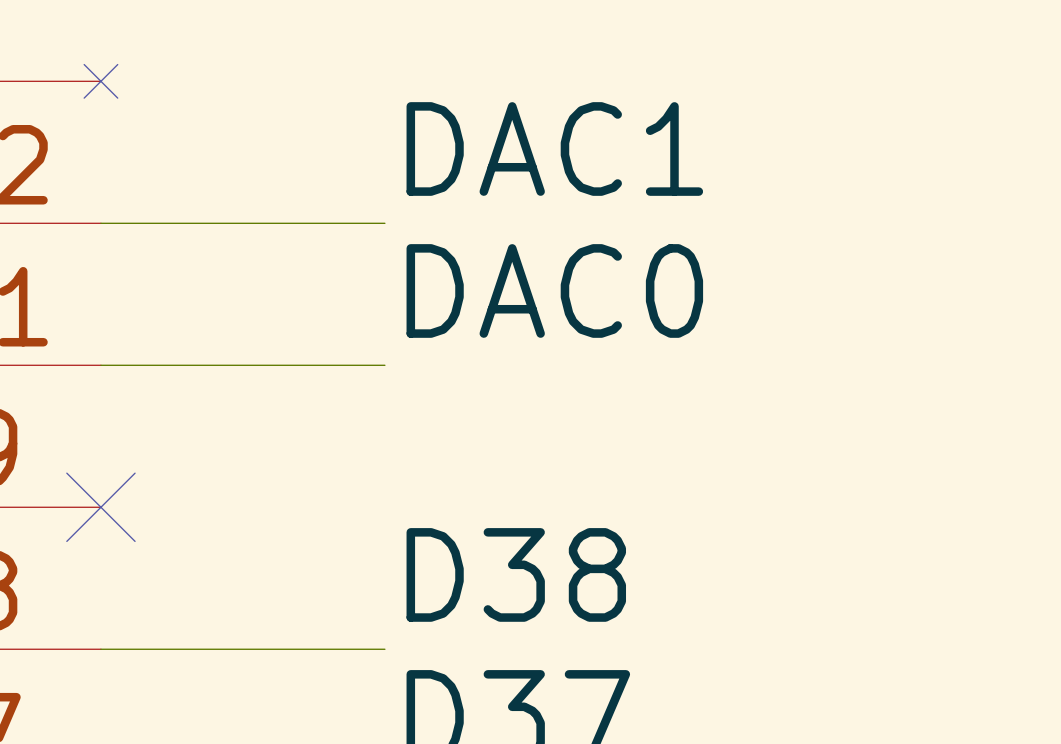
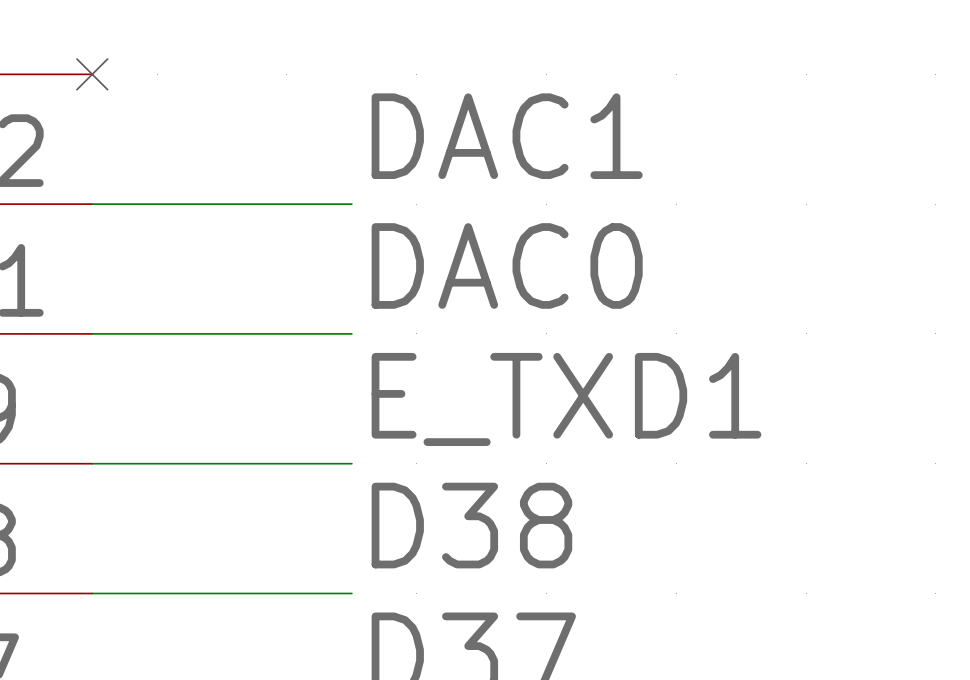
label: none -> E_TXD1 (566, 399)
wire: none -> (92, 463) (351, 463)
no-connect mark: (100, 507) -> none

